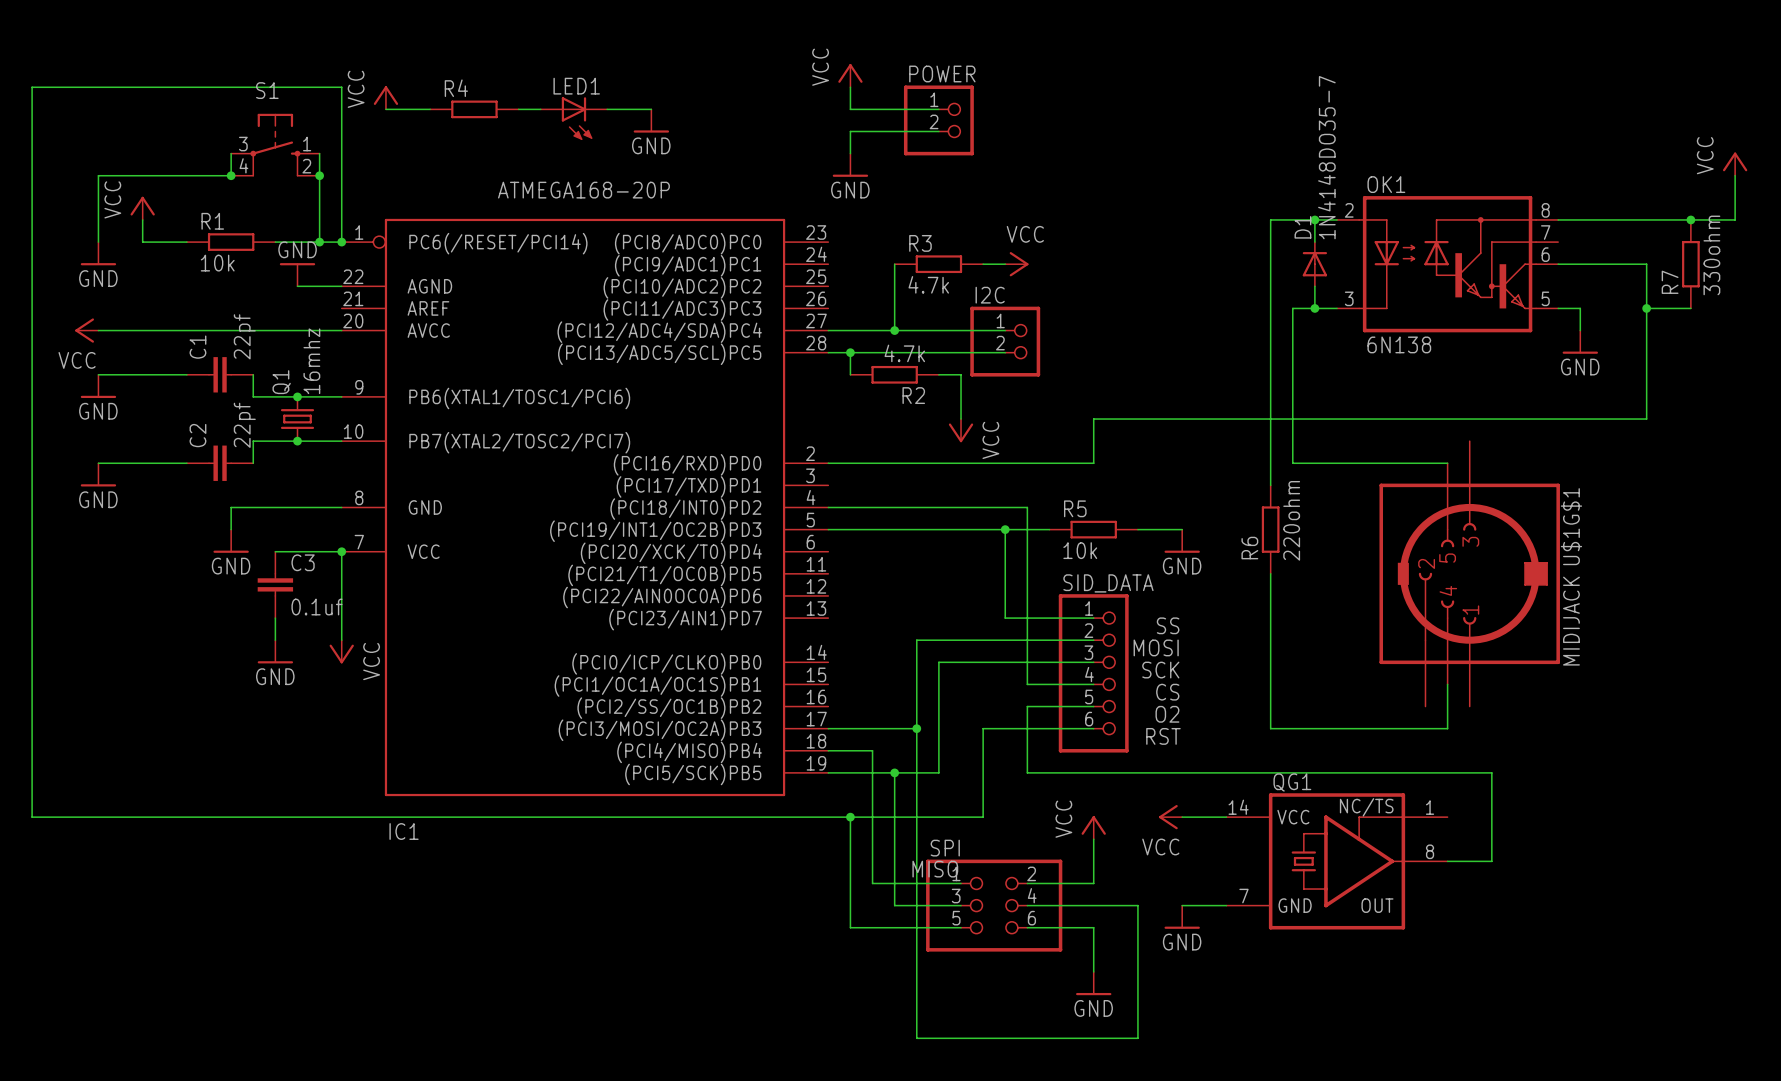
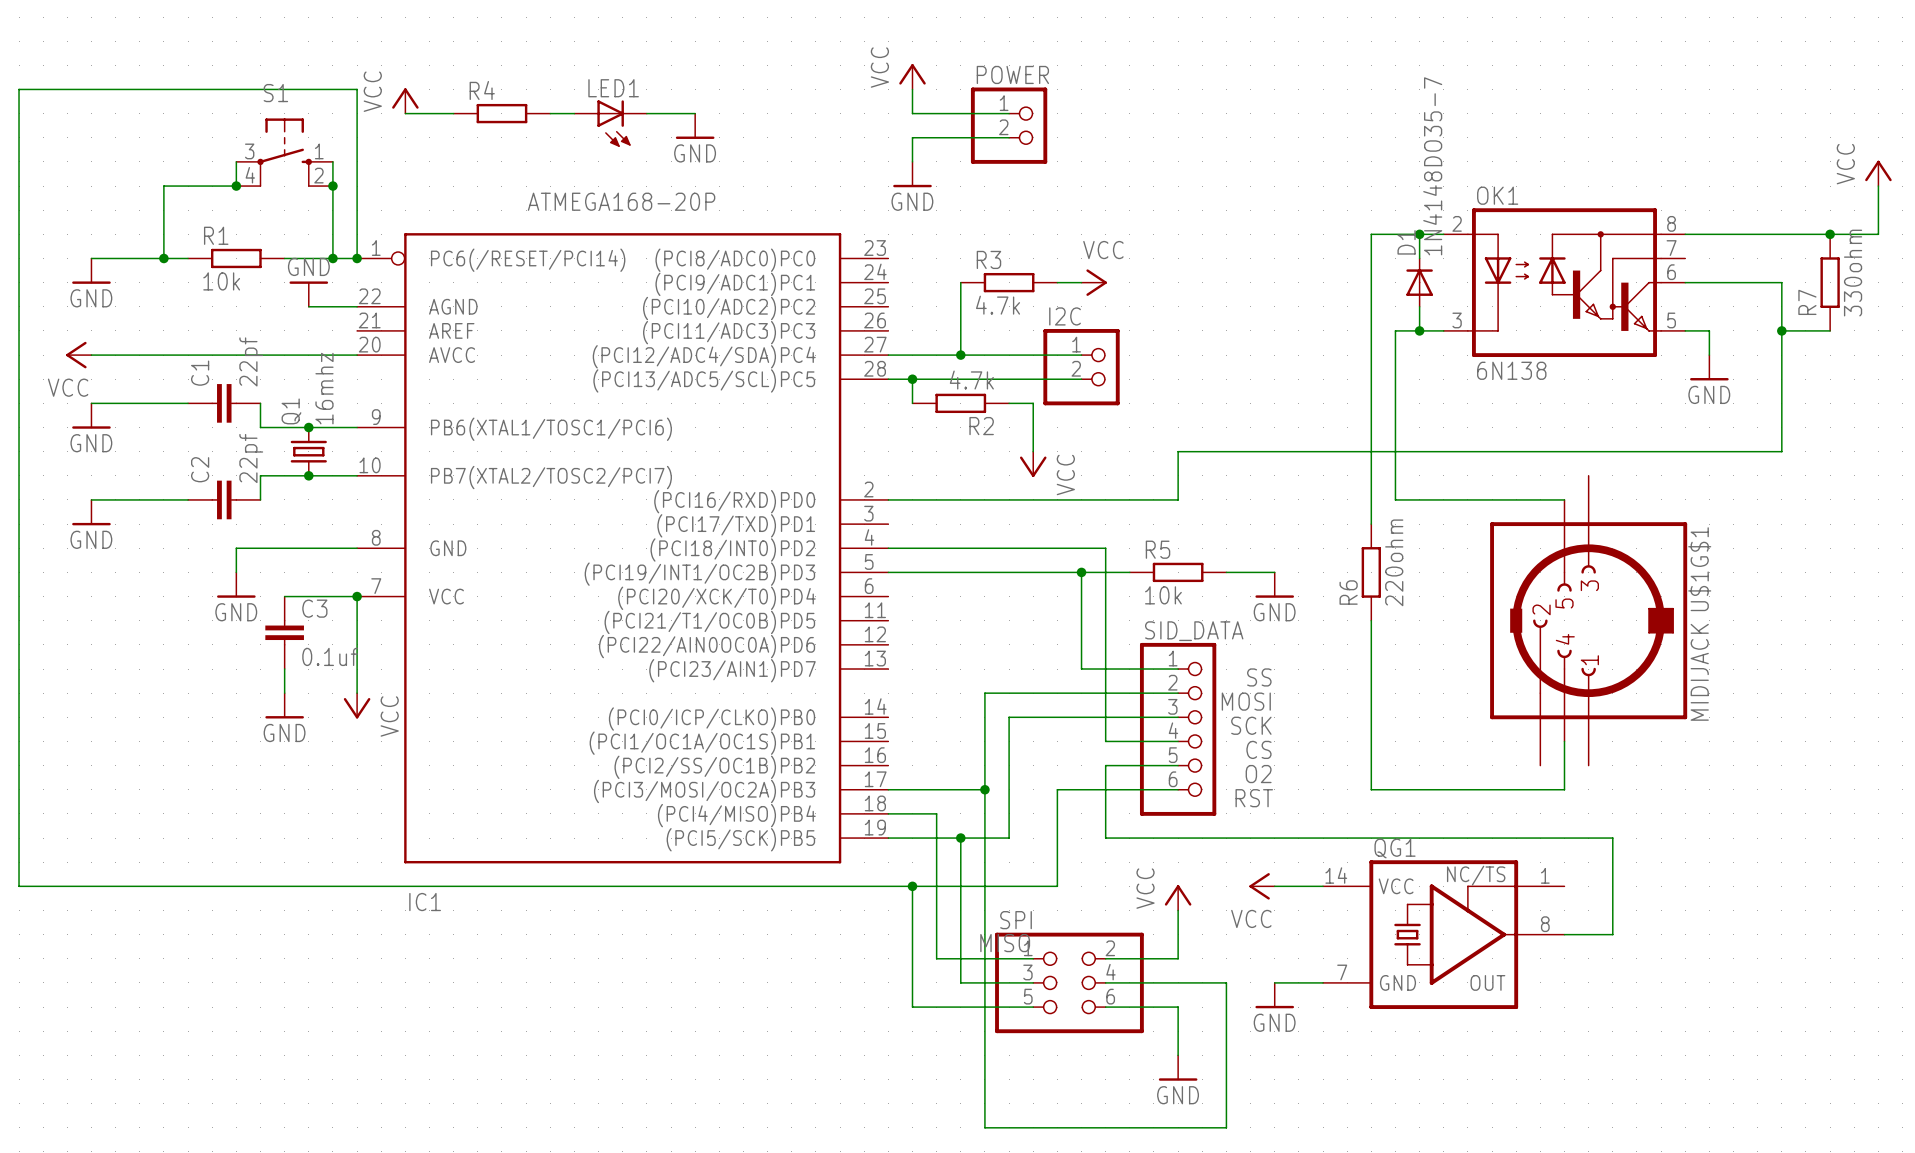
wire: (164, 175) (98, 175) (98, 242) -> (163, 186) (163, 258)
power symbol: VCC (142, 208) -> none
wire: (142, 219) (142, 242) -> (91, 258) (139, 258)
junction: none -> (163, 258)

